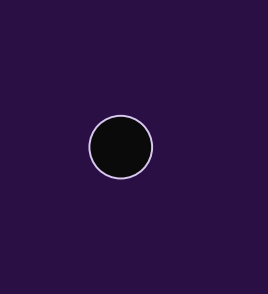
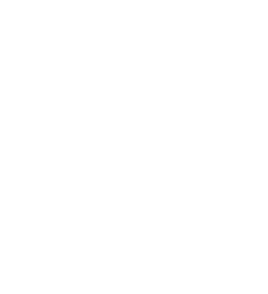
hole: (120, 147) -> none

